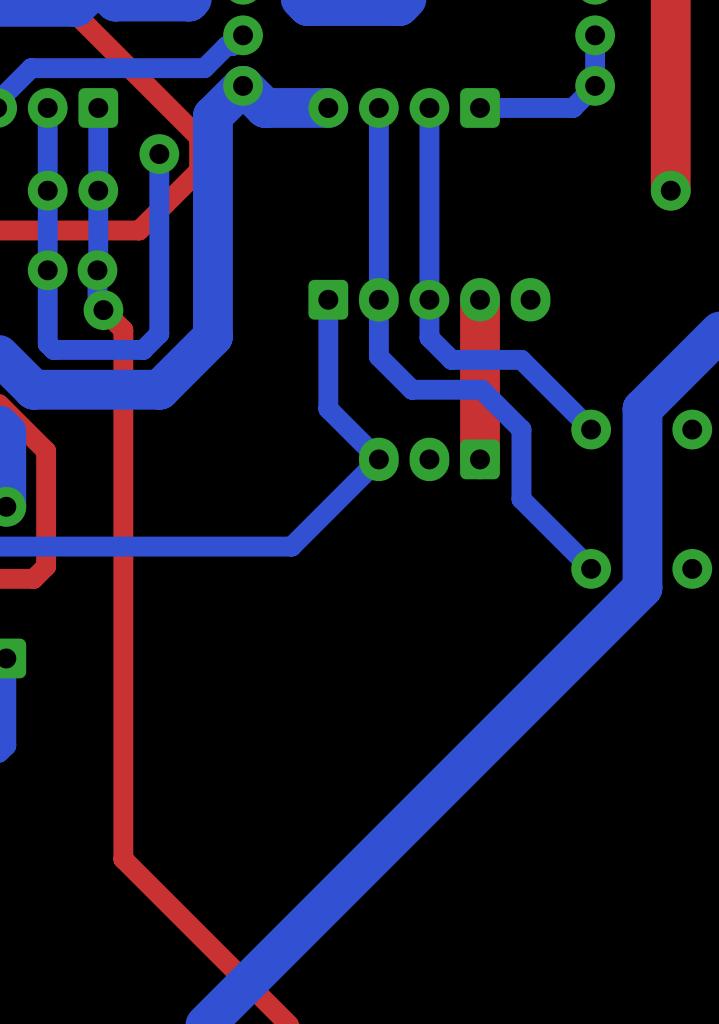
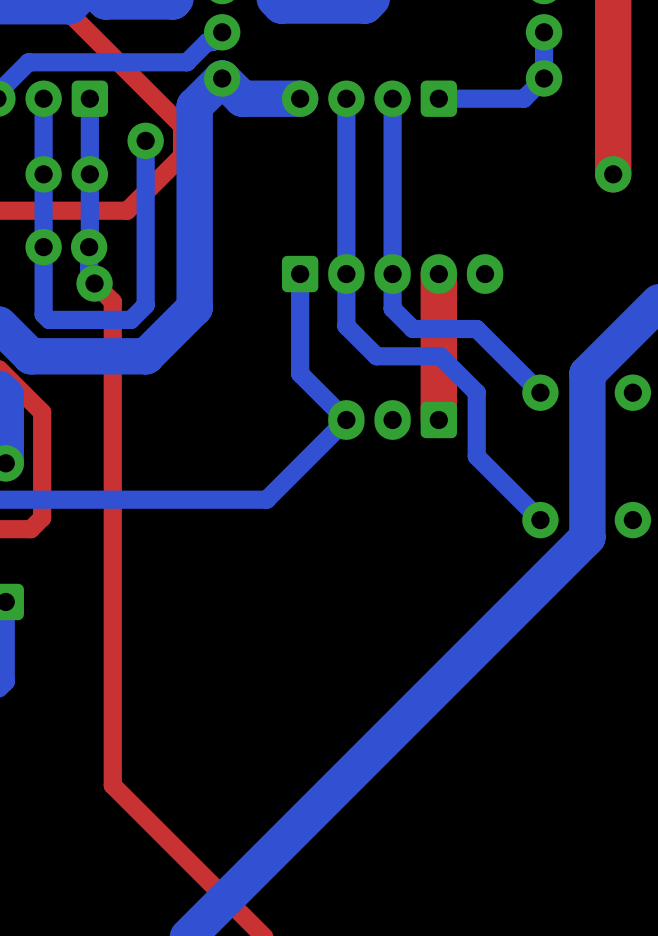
part footprint: [308, 277, 551, 322] -> [281, 254, 504, 294]

